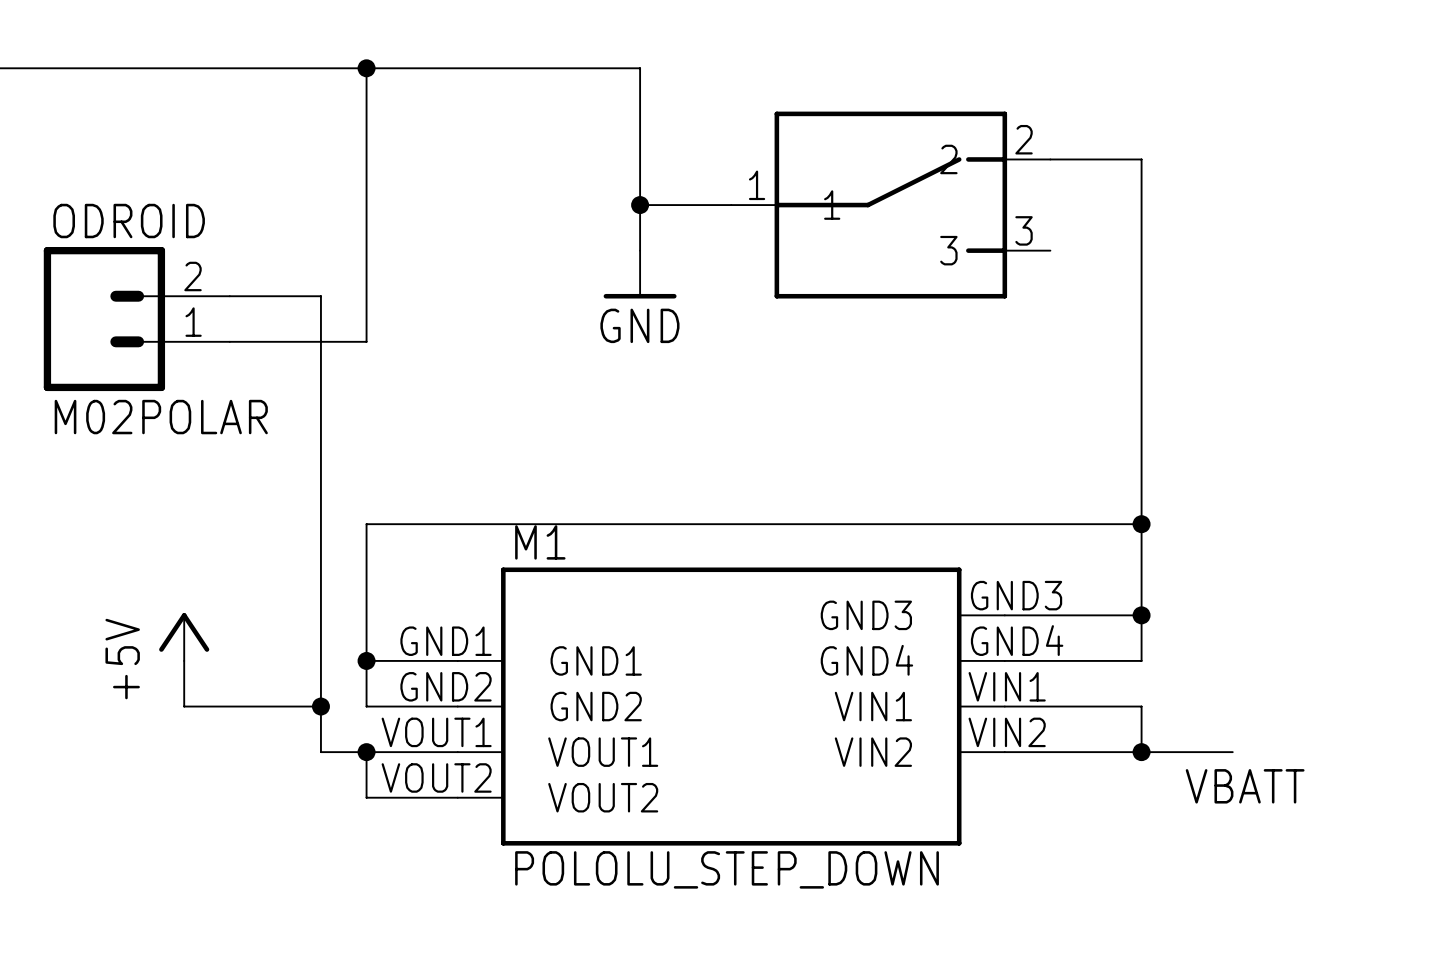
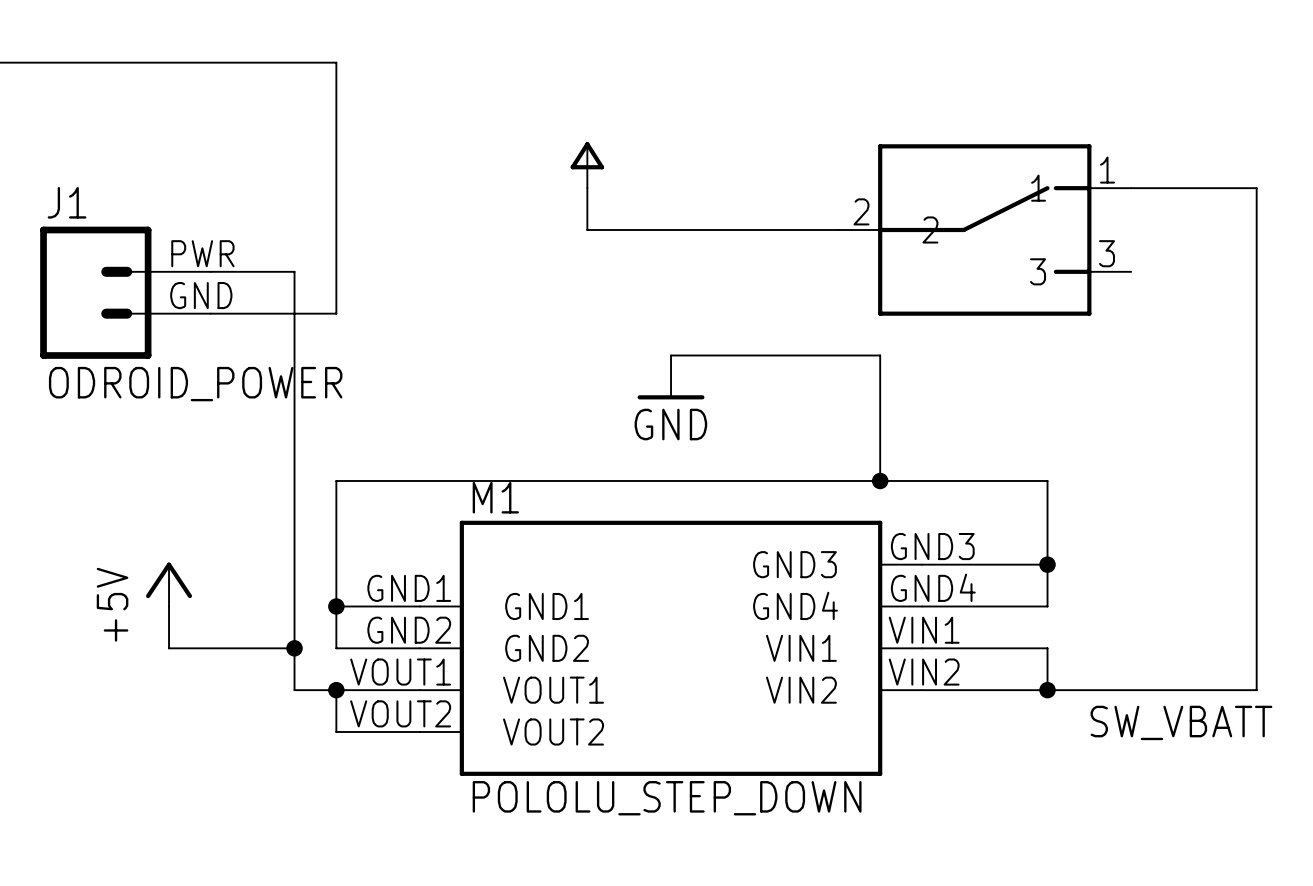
wire: (366, 68) (640, 68) (640, 205) (731, 205) -> none
junction: (366, 68) -> none
wire: (1050, 159) (1141, 159) (1141, 524) -> none
power symbol: none -> (587, 165)
junction: (640, 205) -> none
part: (890, 205) -> none
wire: none -> (1131, 188) (1256, 188) (1256, 690) (1131, 690)
ODROID name: ODROID (129, 221) -> J1 (67, 202)
wire: none -> (587, 229) (838, 229)
part: none -> (984, 229)
power symbol position: GND (640, 274) -> GND (671, 377)
ODROID pin number: 2 (193, 276) -> PWR (202, 253)
ODROID pin number: 1 (193, 322) -> GND (201, 295)
wire: none -> (671, 355) (880, 355) (880, 480)
ODROID value: M02POLAR (161, 417) -> ODROID_POWER (195, 384)
junction: none -> (880, 480)
junction: (1141, 524) -> none
label: VBATT (1245, 786) -> SW_VBATT (1181, 722)

